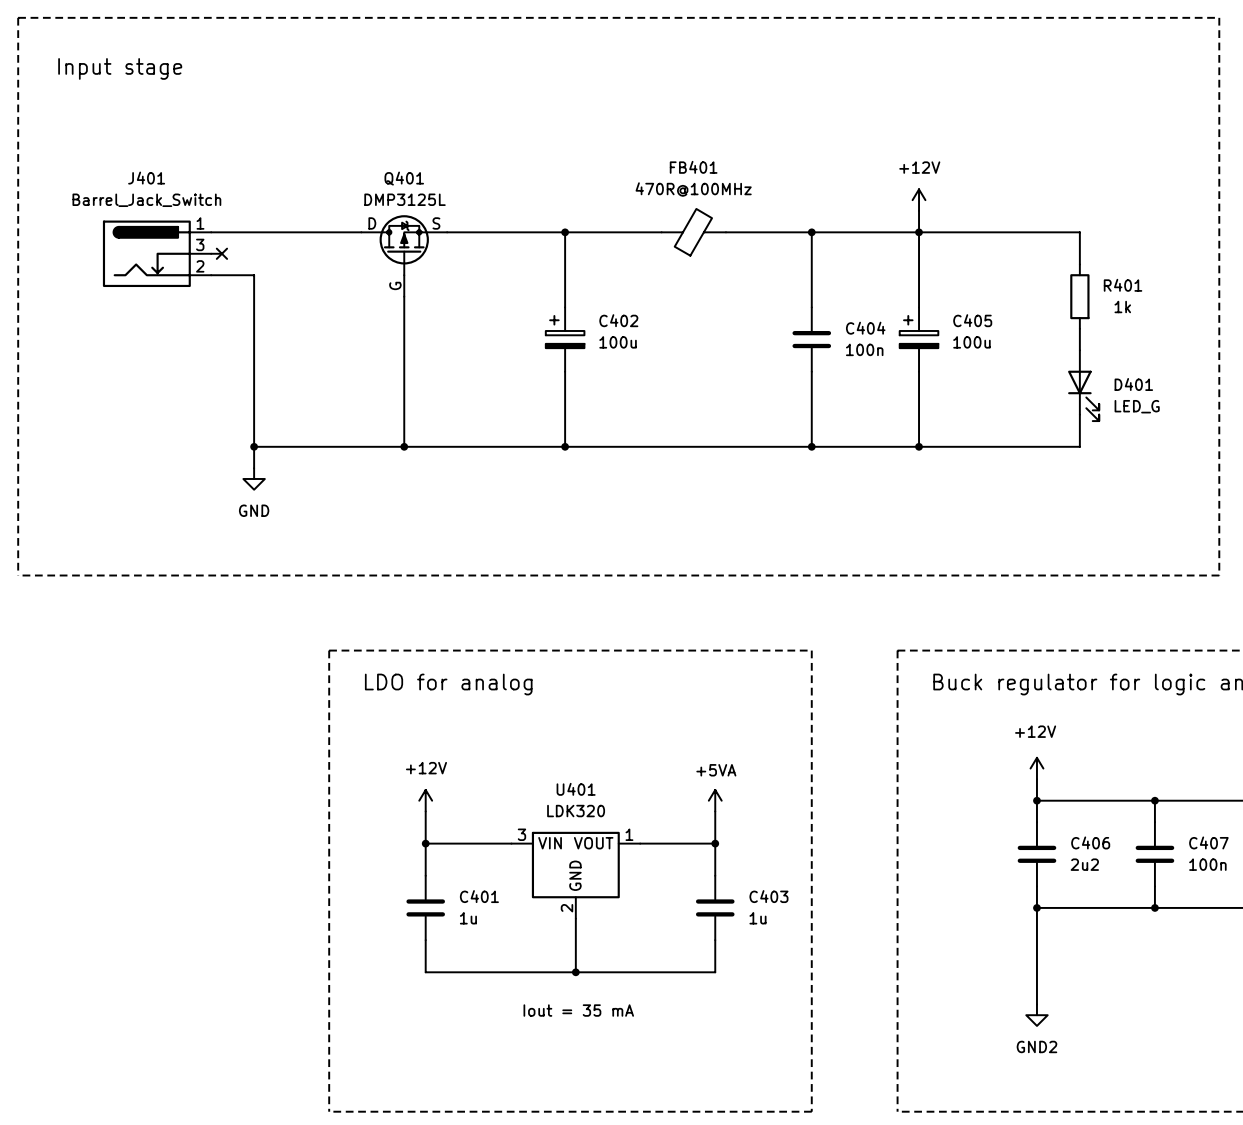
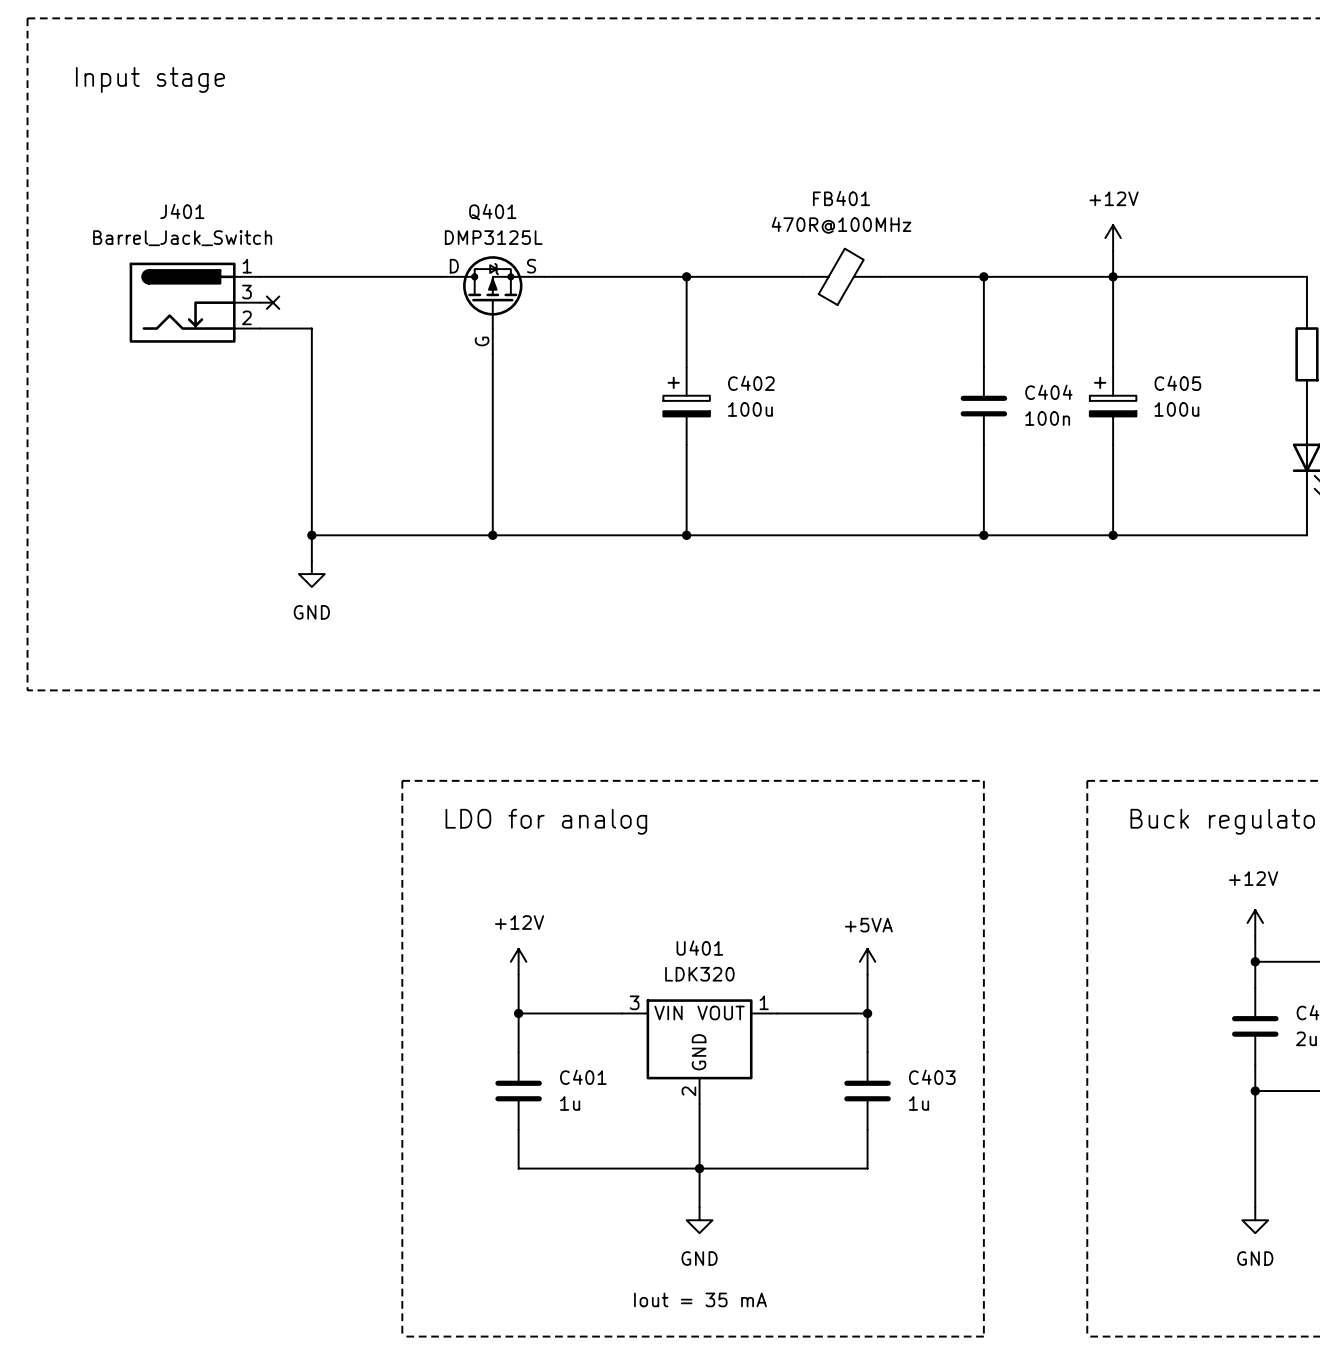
wire: none -> (699, 1168) (699, 1207)
text position: Iout = 35 mA (578, 1010) -> Iout = 35 mA (700, 1299)
power symbol: none -> GND (699, 1220)
power symbol: GND2 (1036, 1015) -> GND (1255, 1220)

